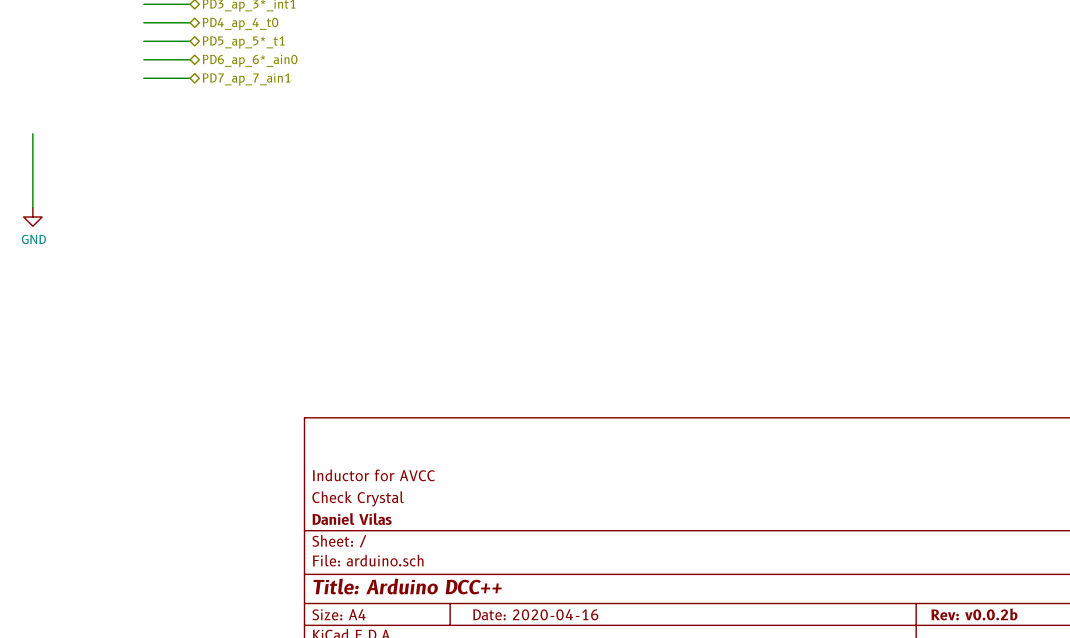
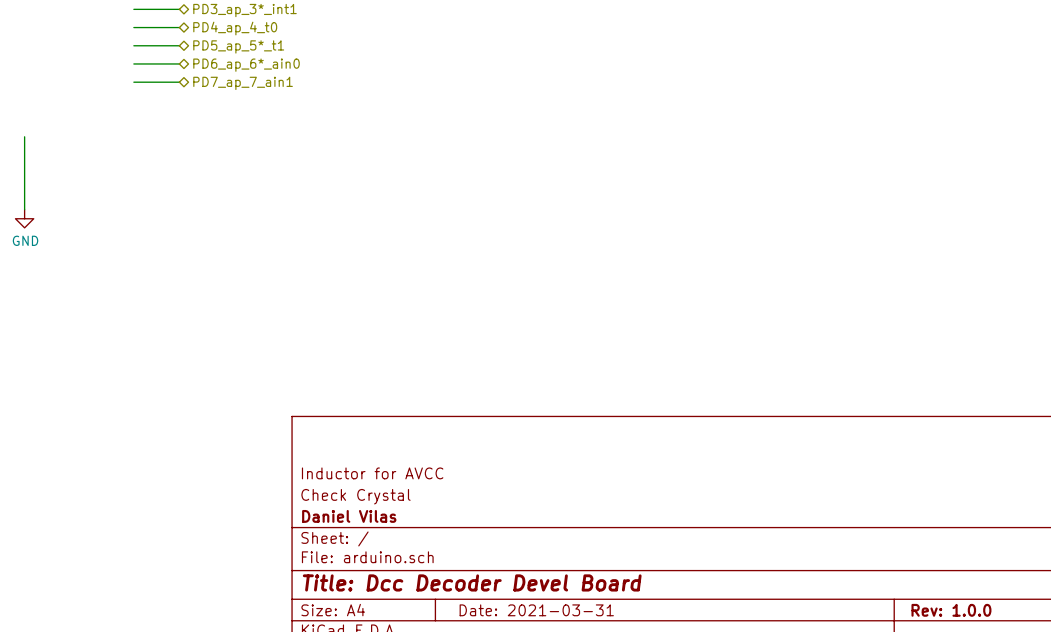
title block: Title: Arduino DCC++ (407, 586) -> Title: Dcc Decoder Devel Board (472, 582)
title block: Date: 2020-04-16 (535, 614) -> Date: 2021-03-31 (536, 610)
title block: Rev: v0.0.2b (974, 614) -> Rev: 1.0.0 (951, 610)

